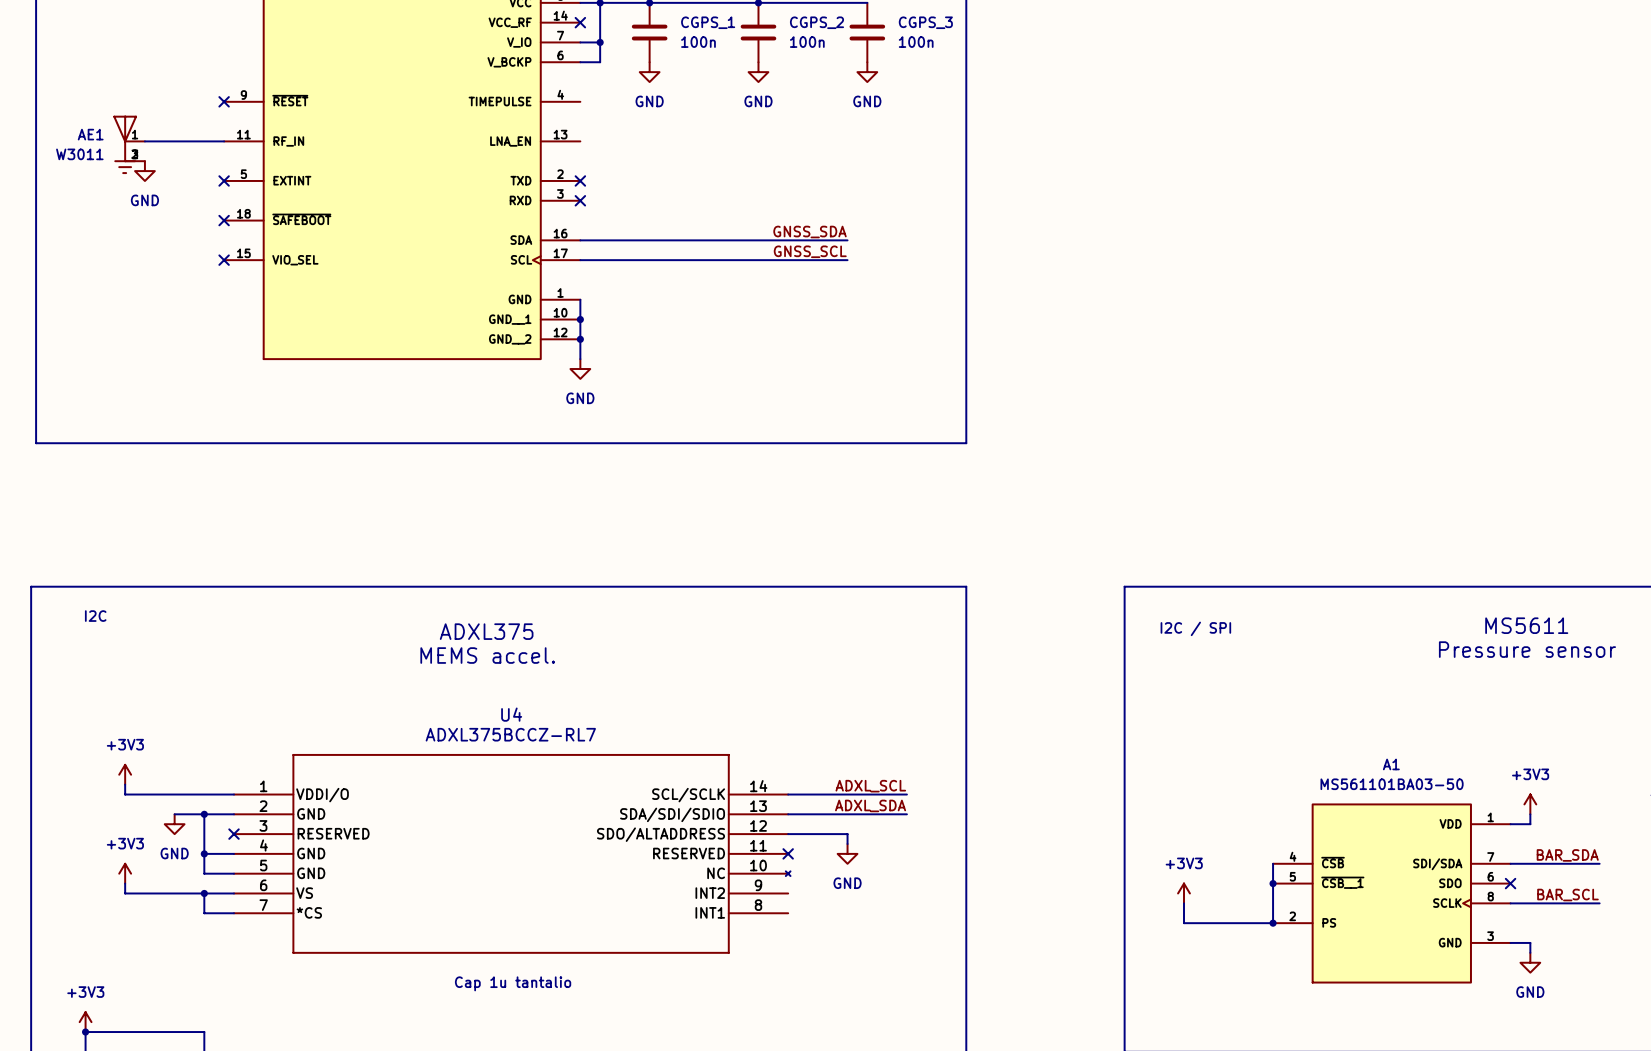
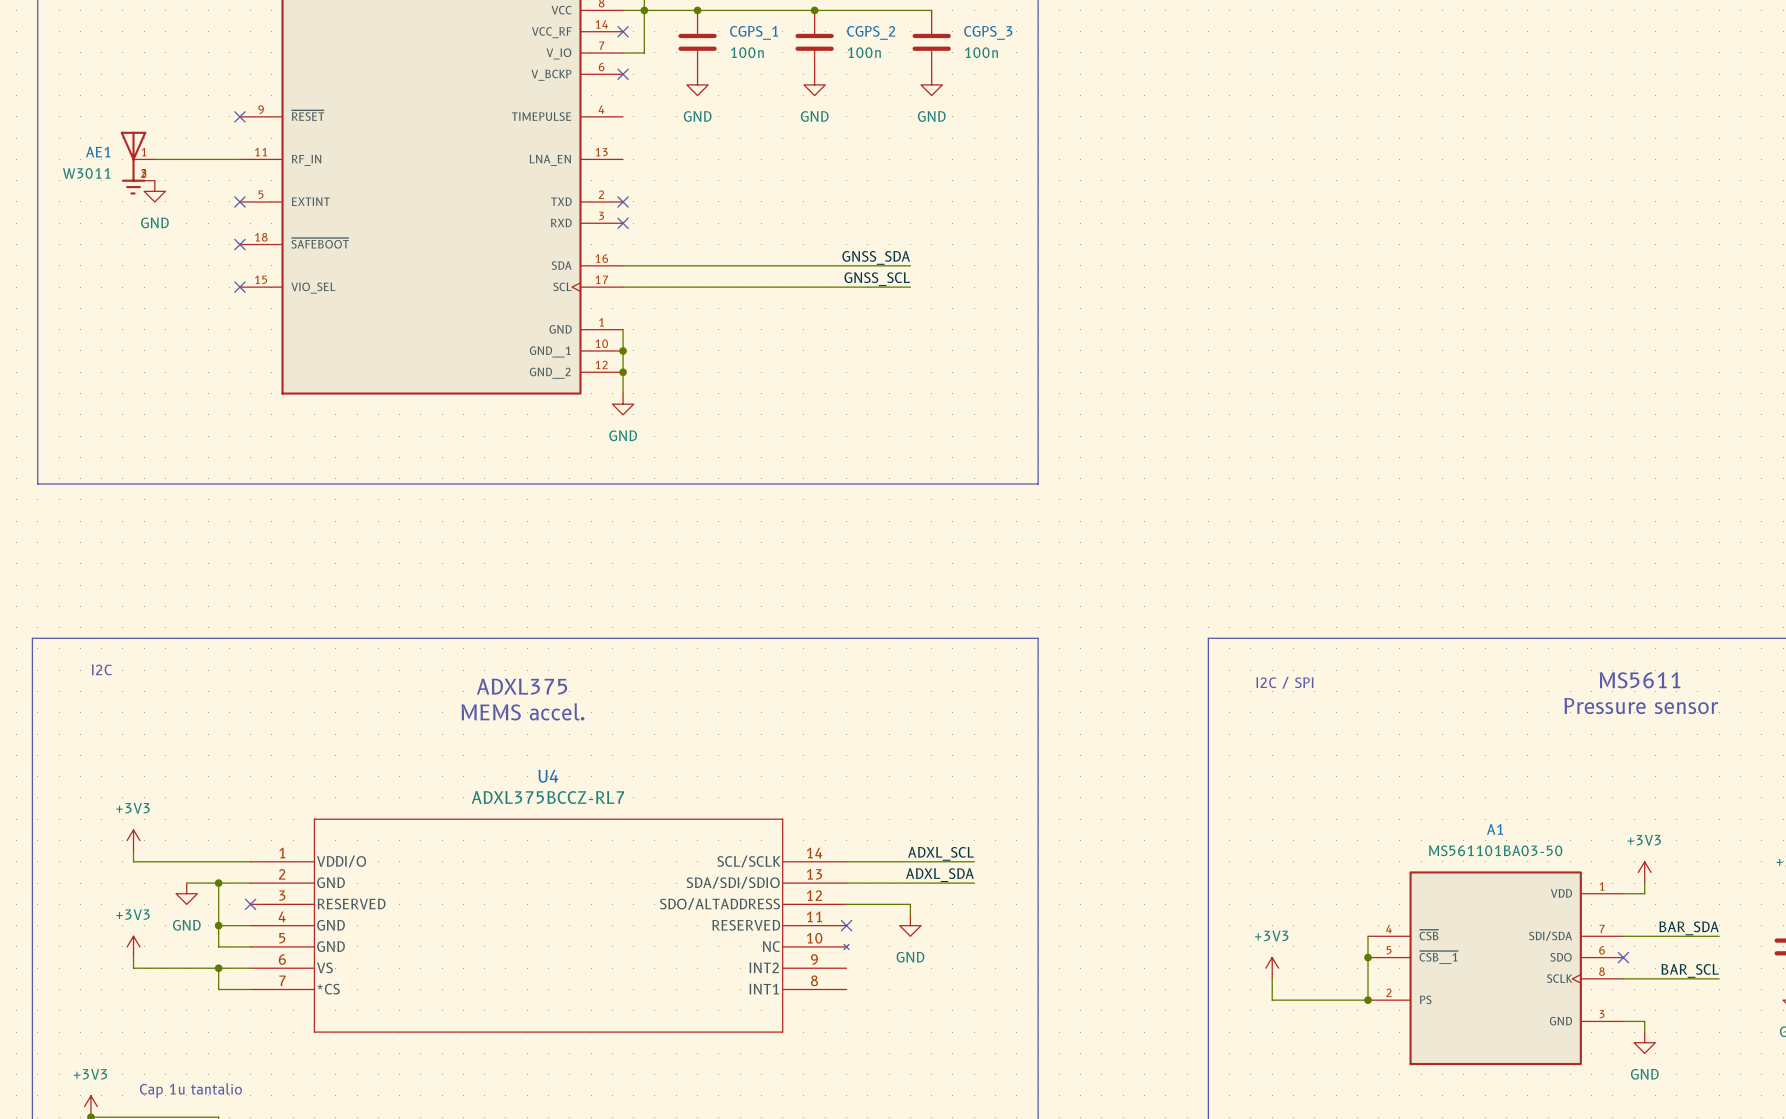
wire: (600, 42) (600, 62) (580, 62) -> none
junction: (600, 42) -> none
no-connect mark: none -> (623, 74)
text: Cap 1u tantalio (513, 983) -> none
text: none -> Cap 1u tantalio (190, 1090)

